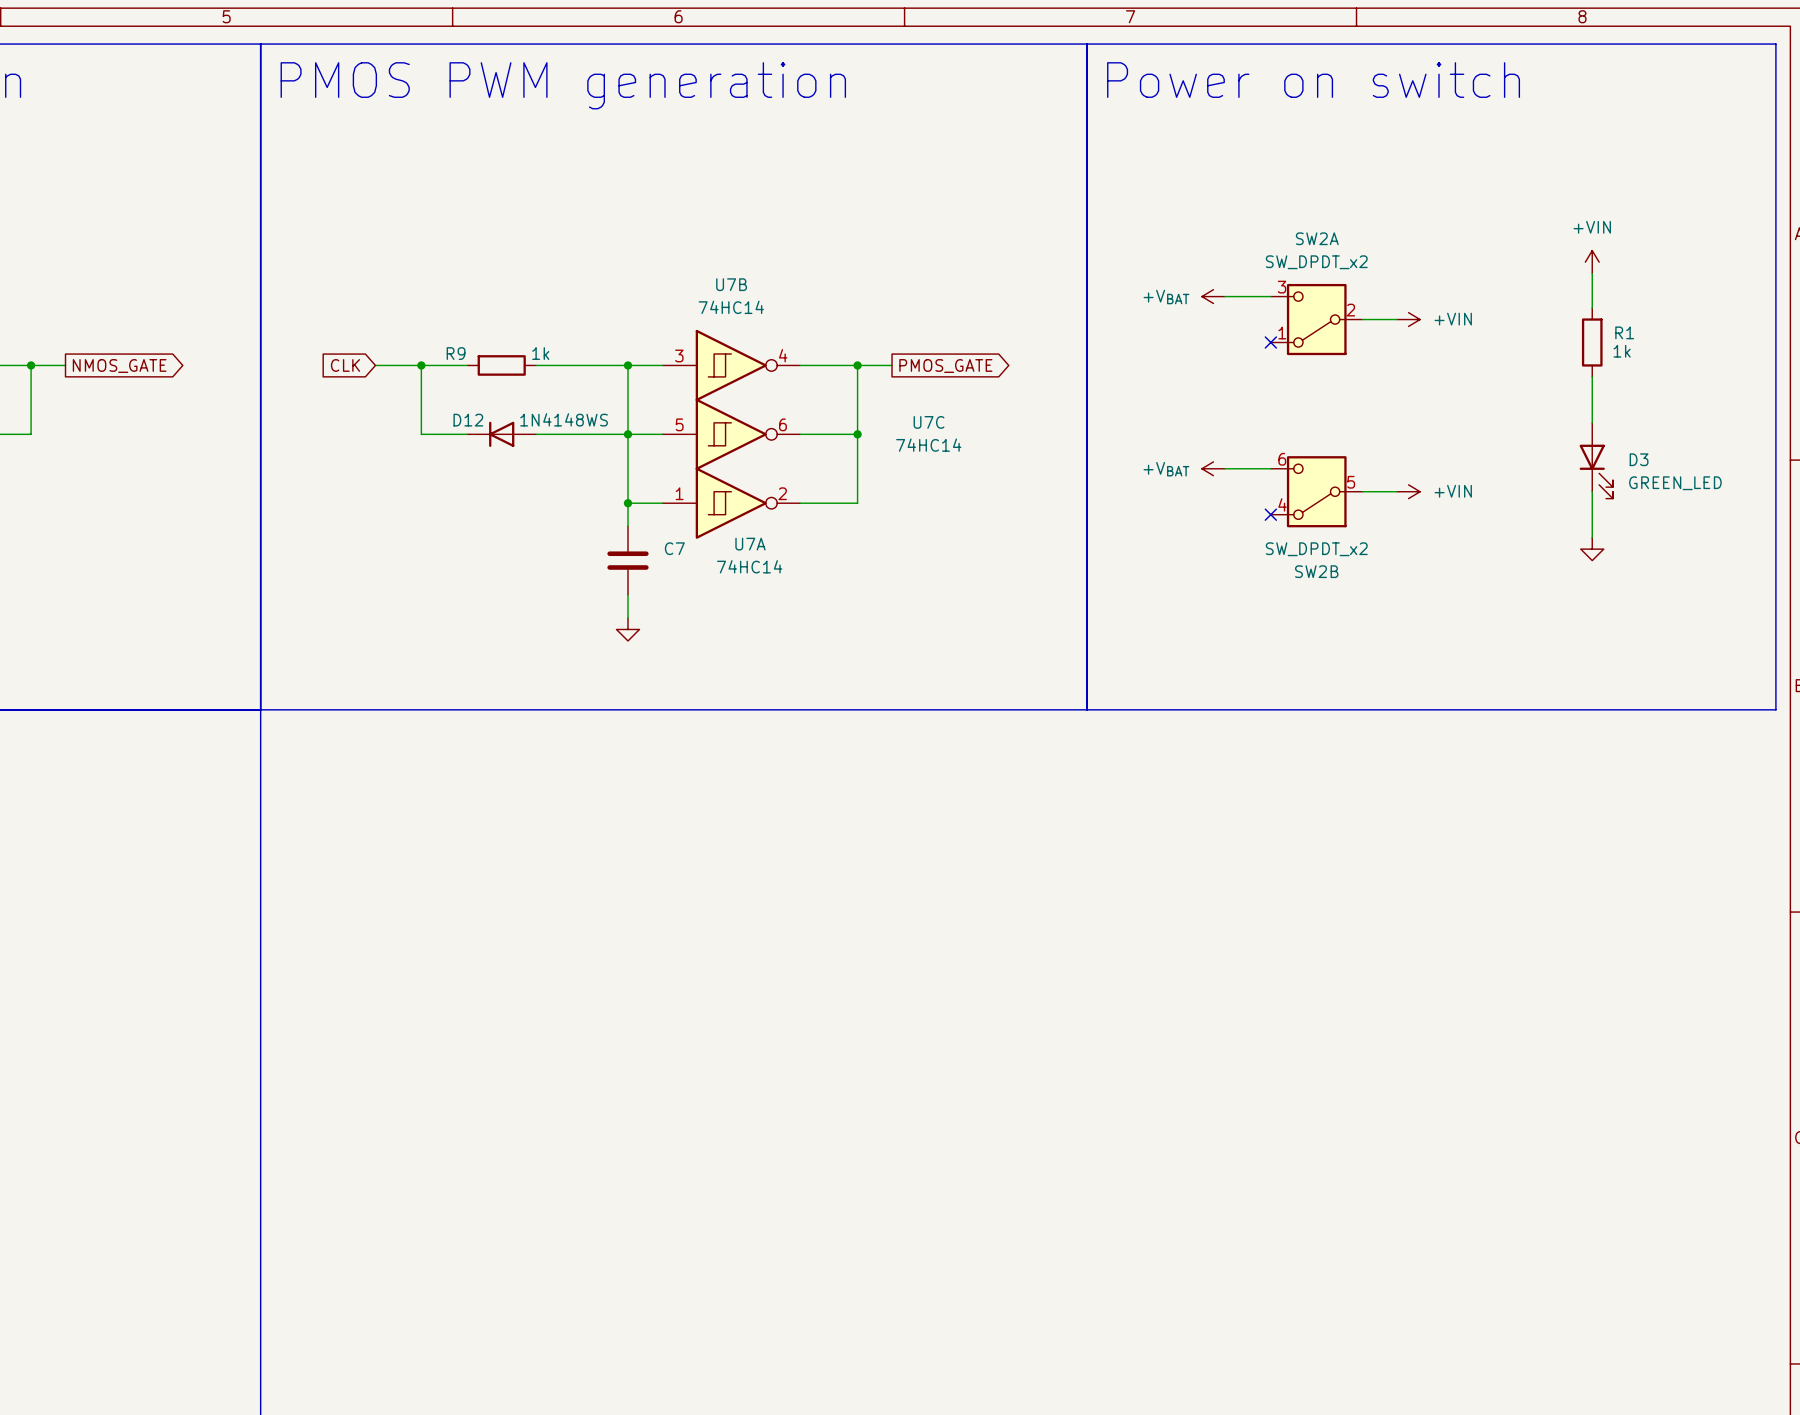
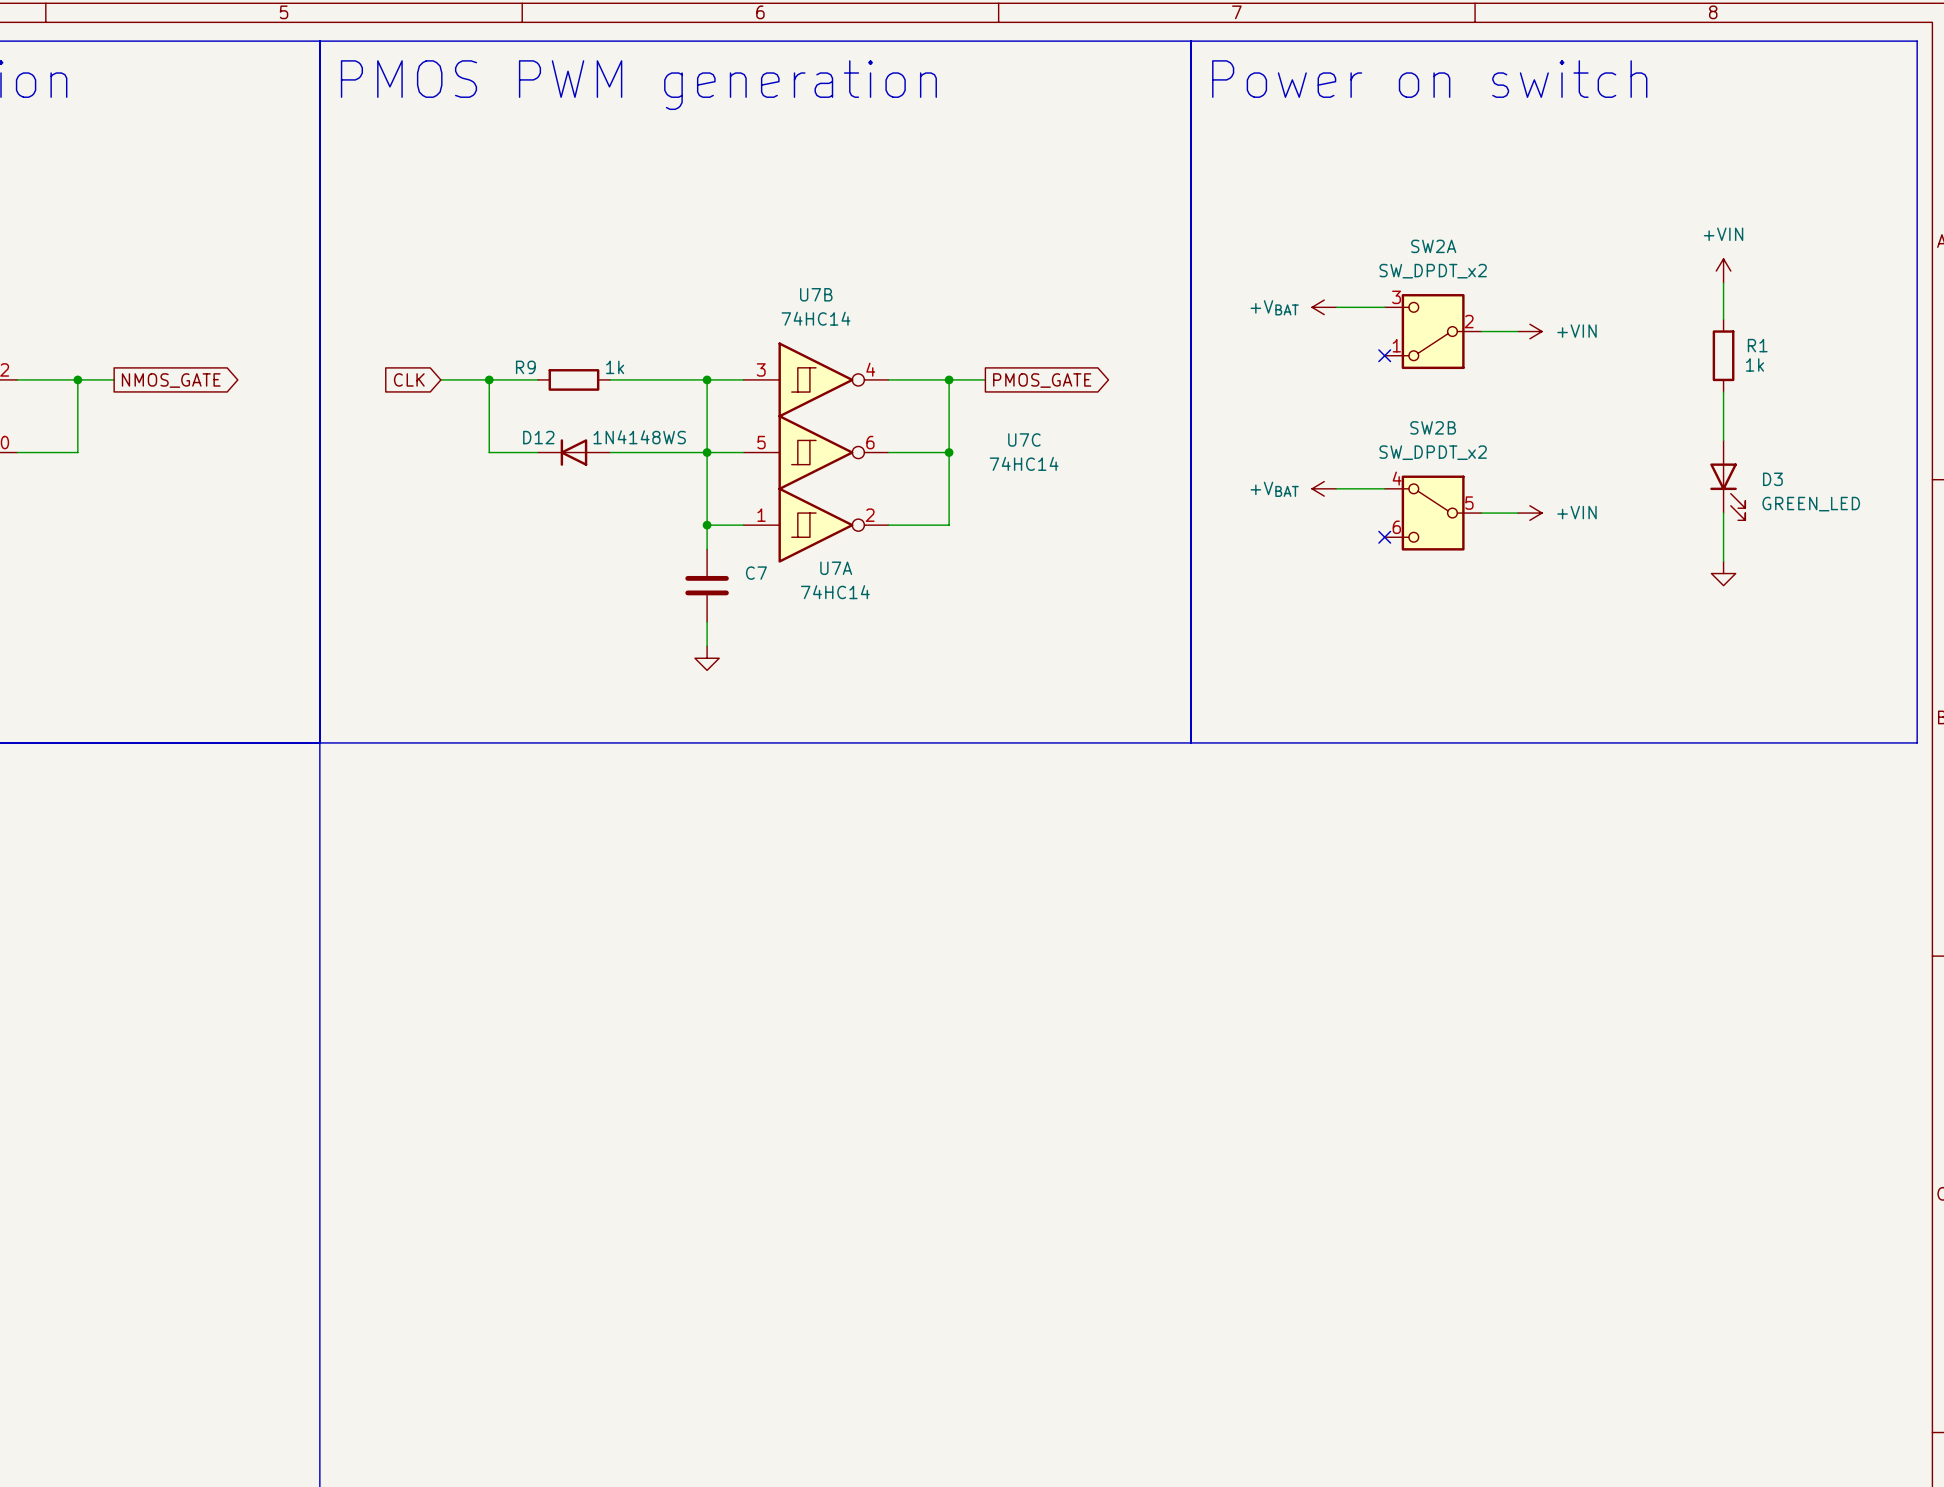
SW2B flip: as is (1316, 491) -> up-down (1433, 513)

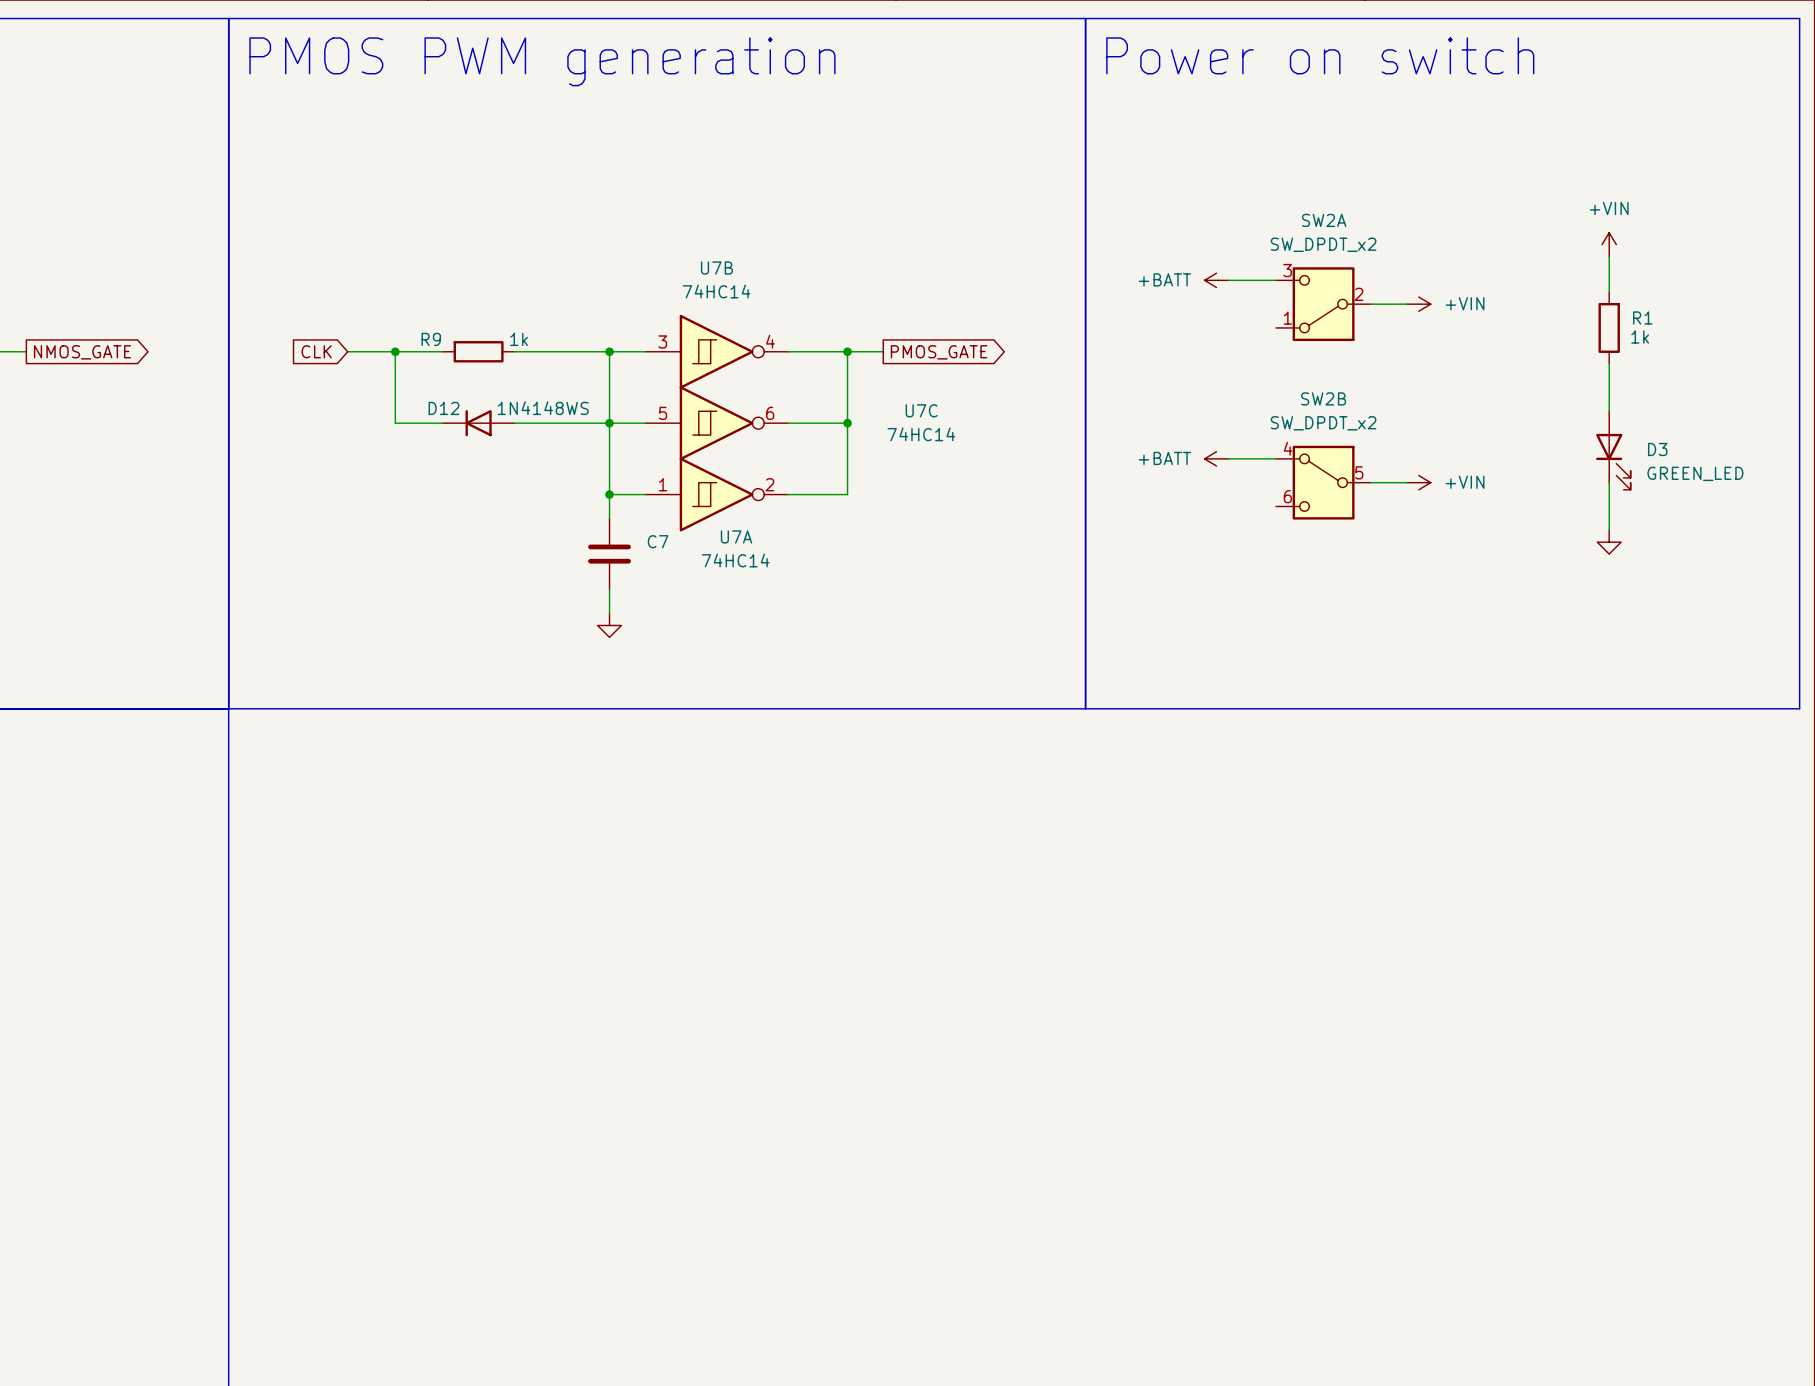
power symbol: +VBAT (1324, 307) -> +BATT (1216, 280)
no-connect mark: (1384, 355) -> none
power symbol: +VBAT (1324, 488) -> +BATT (1216, 458)
no-connect mark: (1384, 537) -> none

